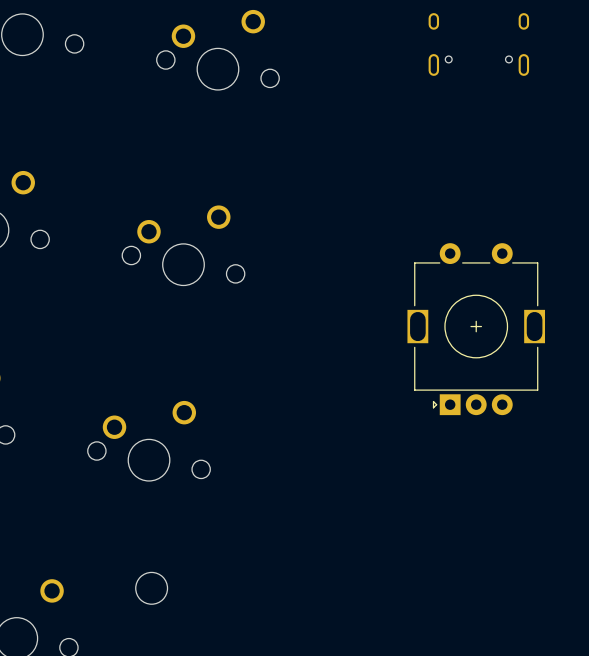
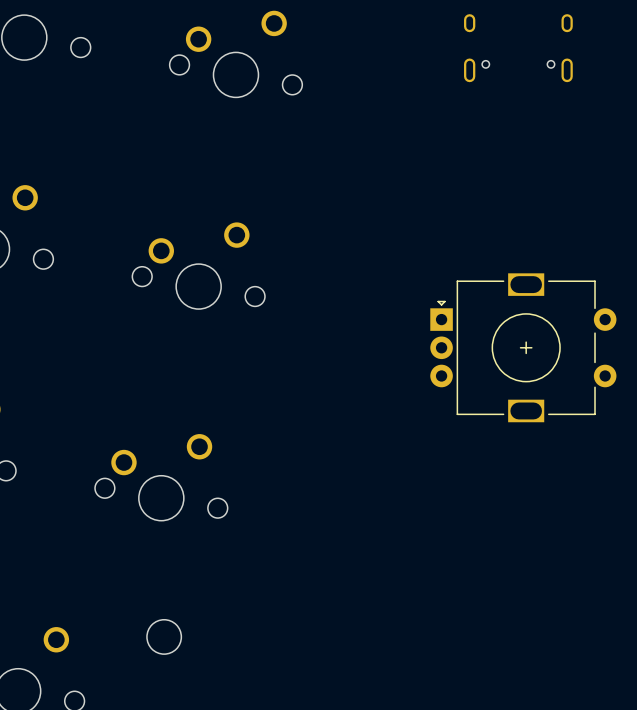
part rotation: 0° (476, 329) -> 90° clockwise (523, 347)

